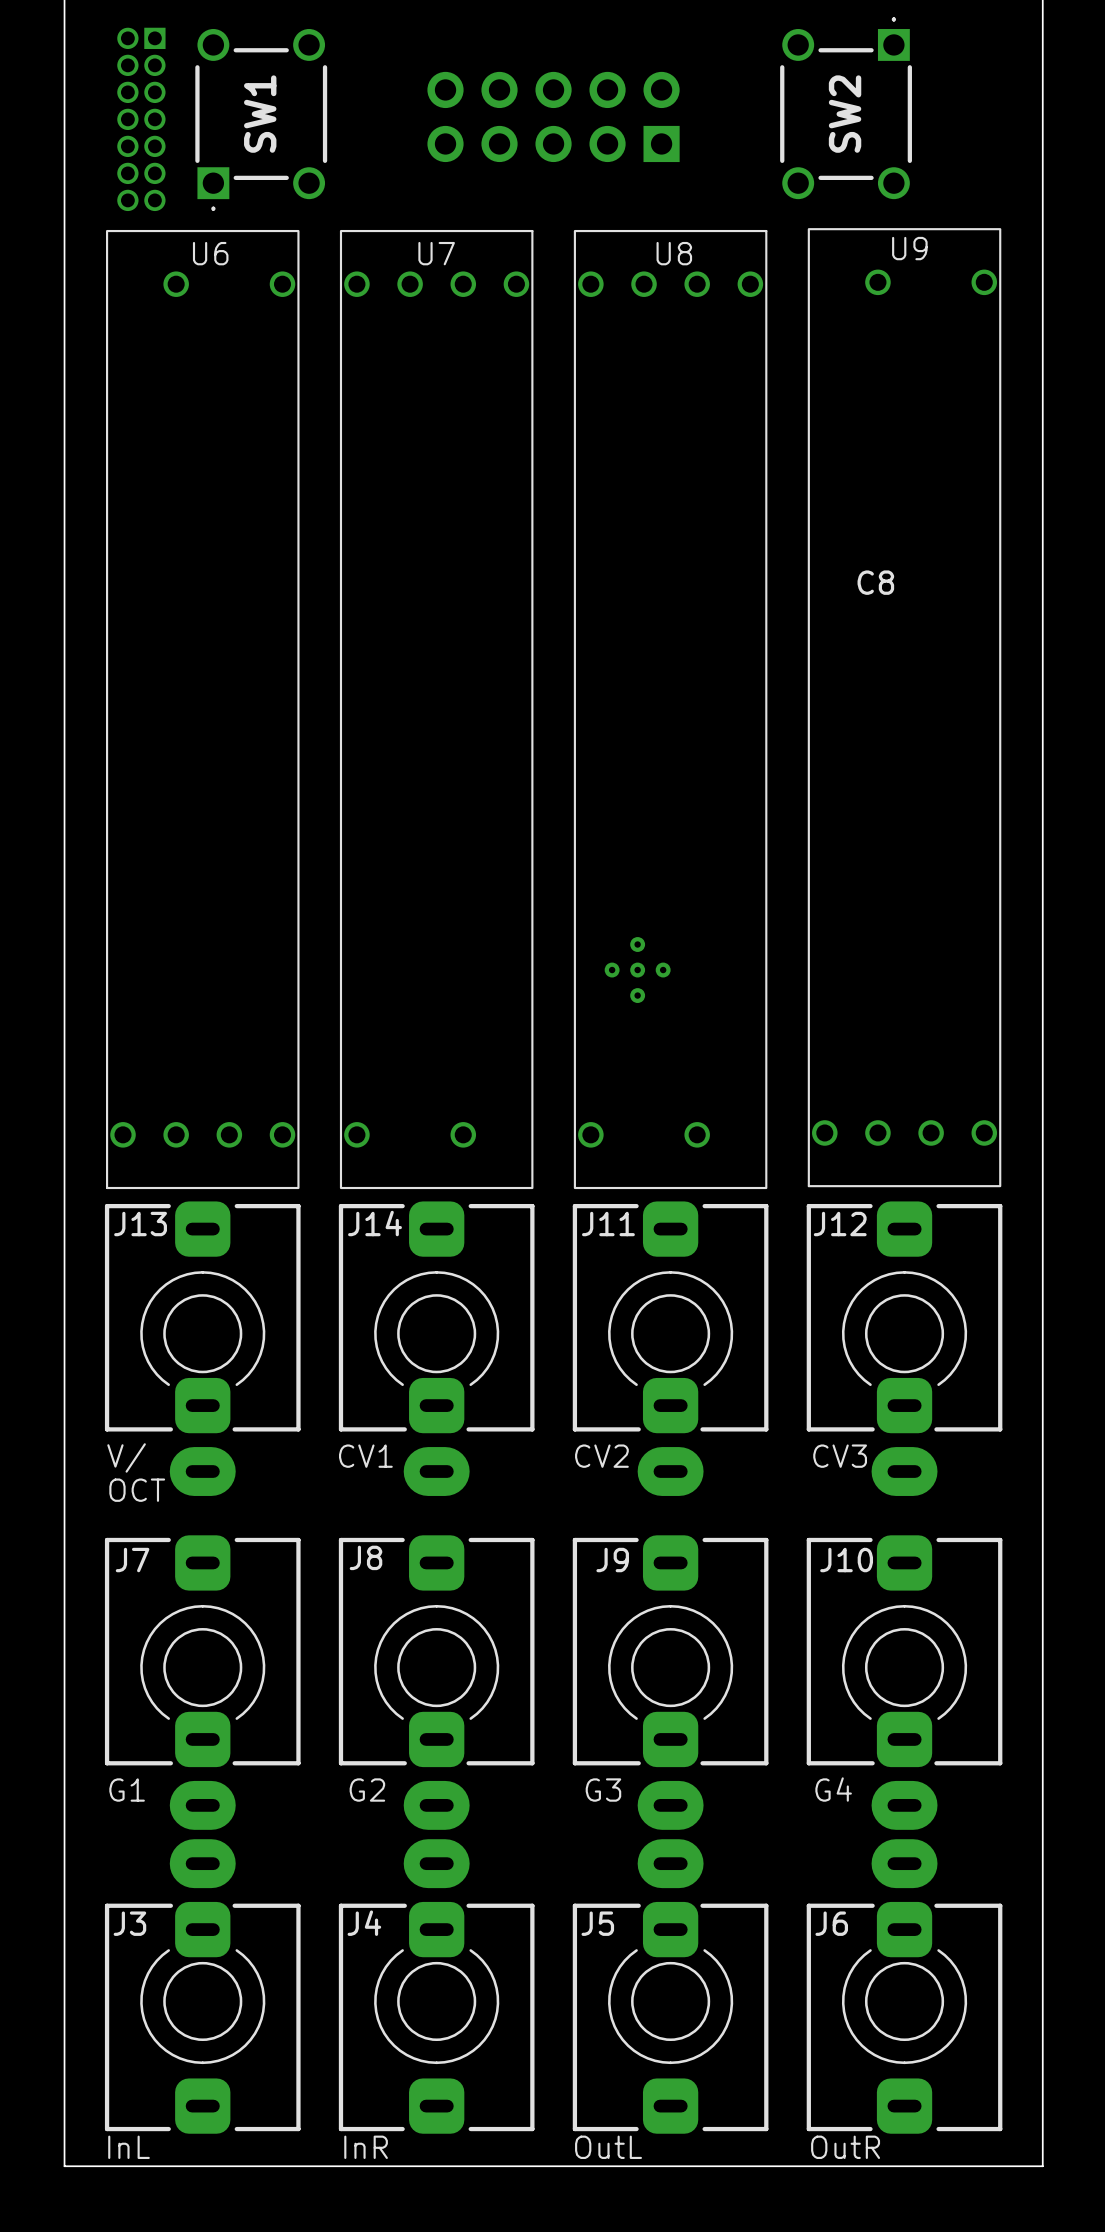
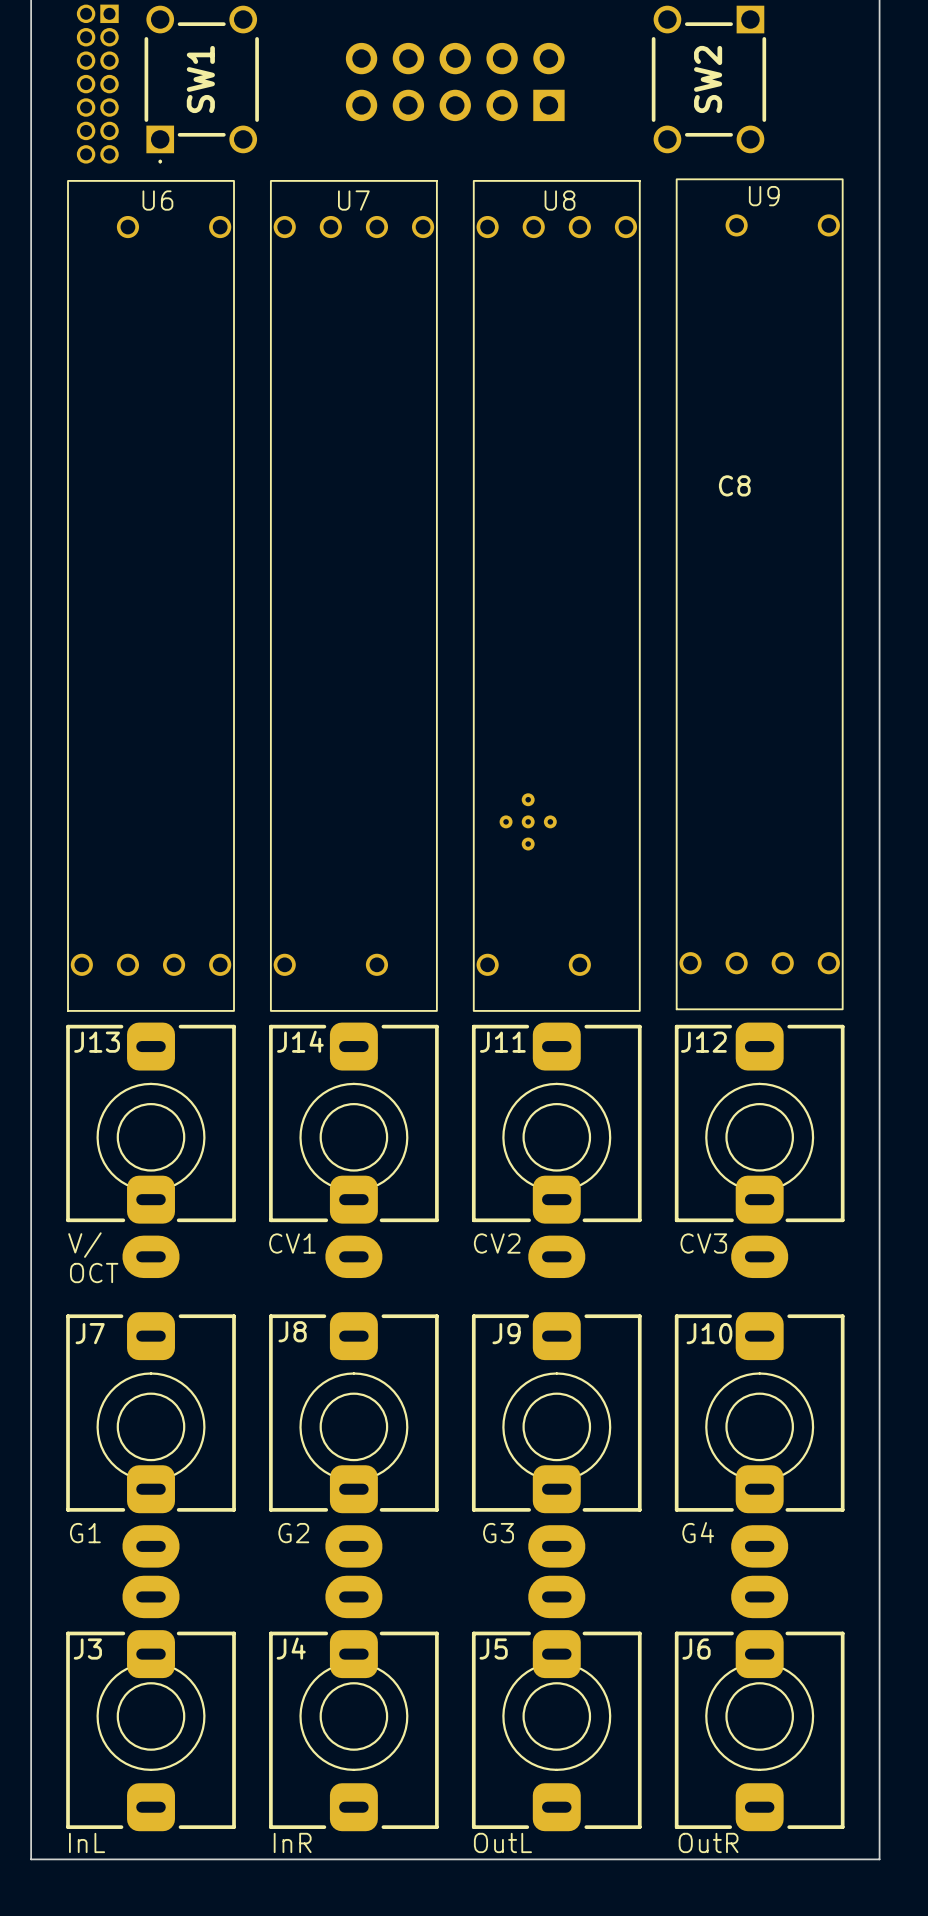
J13 footprint: [104, 1201, 301, 1496] -> [66, 1022, 236, 1279]
J14 footprint: [338, 1201, 535, 1496] -> [269, 1022, 439, 1279]
J11 footprint: [572, 1201, 769, 1496] -> [471, 1022, 642, 1279]
J12 footprint: [806, 1201, 1003, 1496] -> [674, 1022, 845, 1279]
J7 footprint: [104, 1535, 301, 1830] -> [66, 1312, 236, 1568]
J8 footprint: [338, 1535, 535, 1830] -> [269, 1312, 439, 1568]
J9 footprint: [572, 1535, 769, 1830] -> [471, 1312, 642, 1568]
J10 footprint: [806, 1535, 1003, 1830] -> [674, 1312, 845, 1568]
J3 footprint: [104, 1839, 301, 2134] -> [66, 1575, 236, 1832]
J4 footprint: [338, 1839, 535, 2134] -> [269, 1575, 439, 1832]
J5 footprint: [572, 1839, 769, 2134] -> [471, 1575, 642, 1832]
J6 footprint: [806, 1839, 1003, 2134] -> [674, 1575, 845, 1832]

